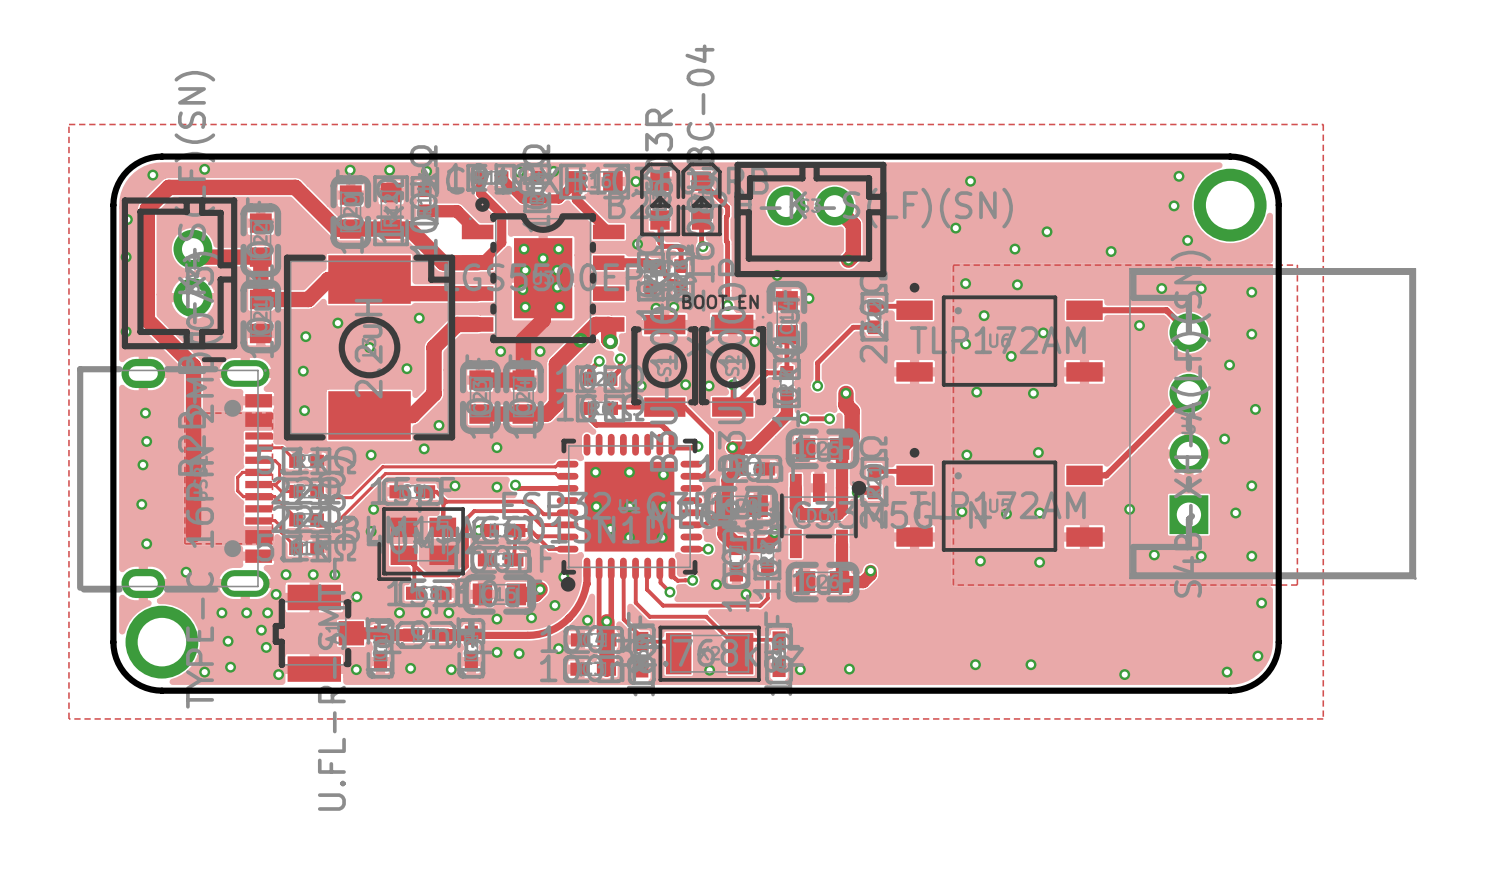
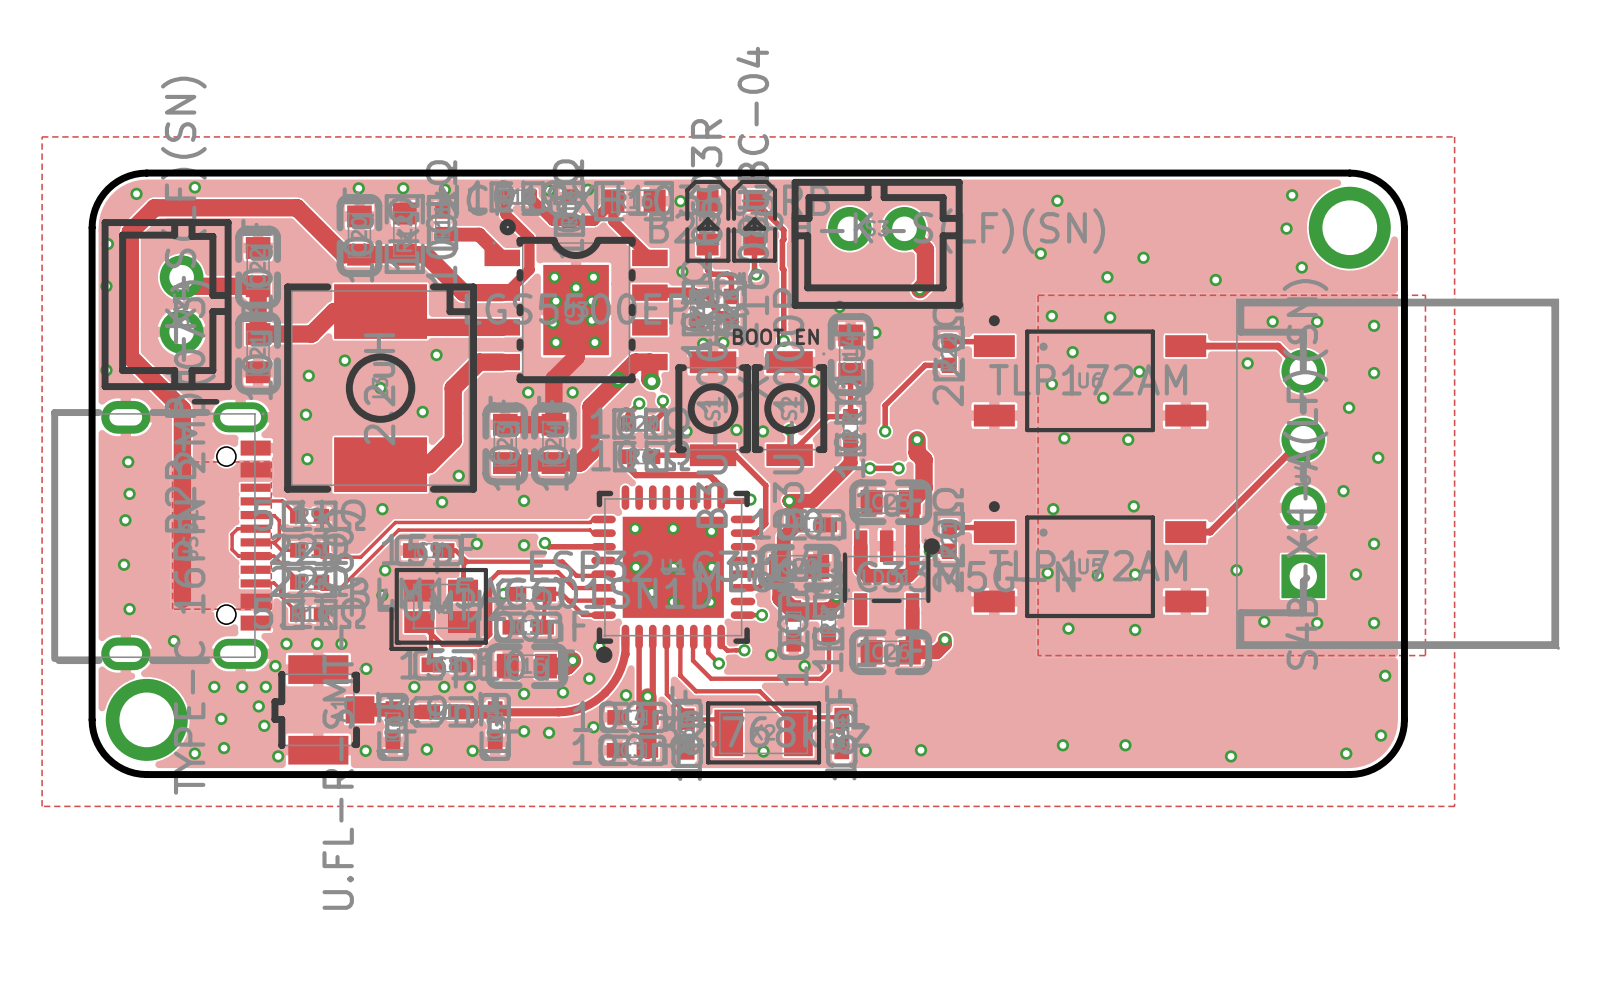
part footprint: [77, 358, 272, 599] -> [51, 400, 271, 671]

